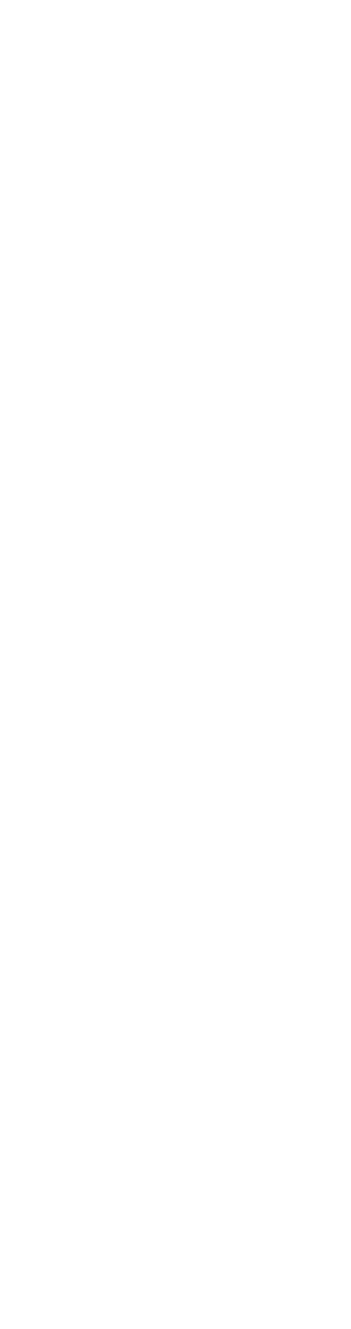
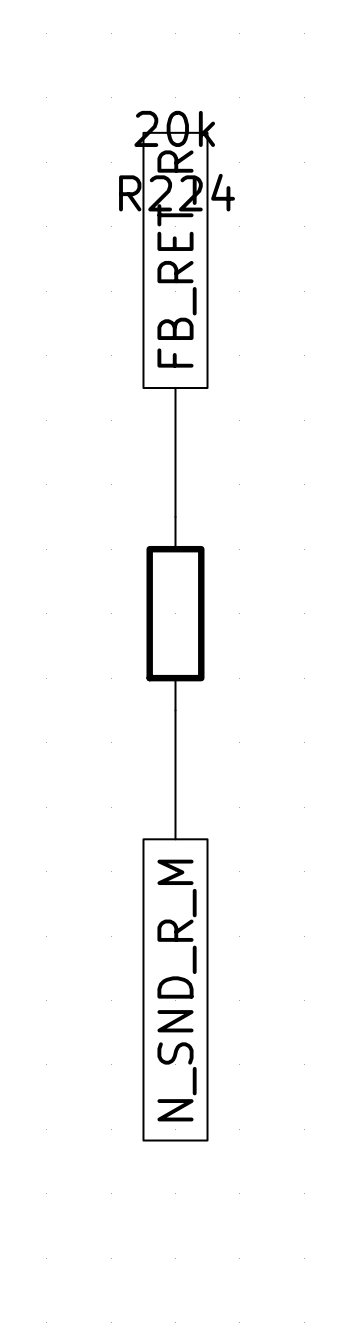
global label: none -> FB_RET_R (177, 259)
wire: none -> (175, 388) (175, 516)
R224: none -> 20k (175, 613)
wire: none -> (175, 710) (175, 839)
global label: none -> N_SND_R_M (177, 990)

